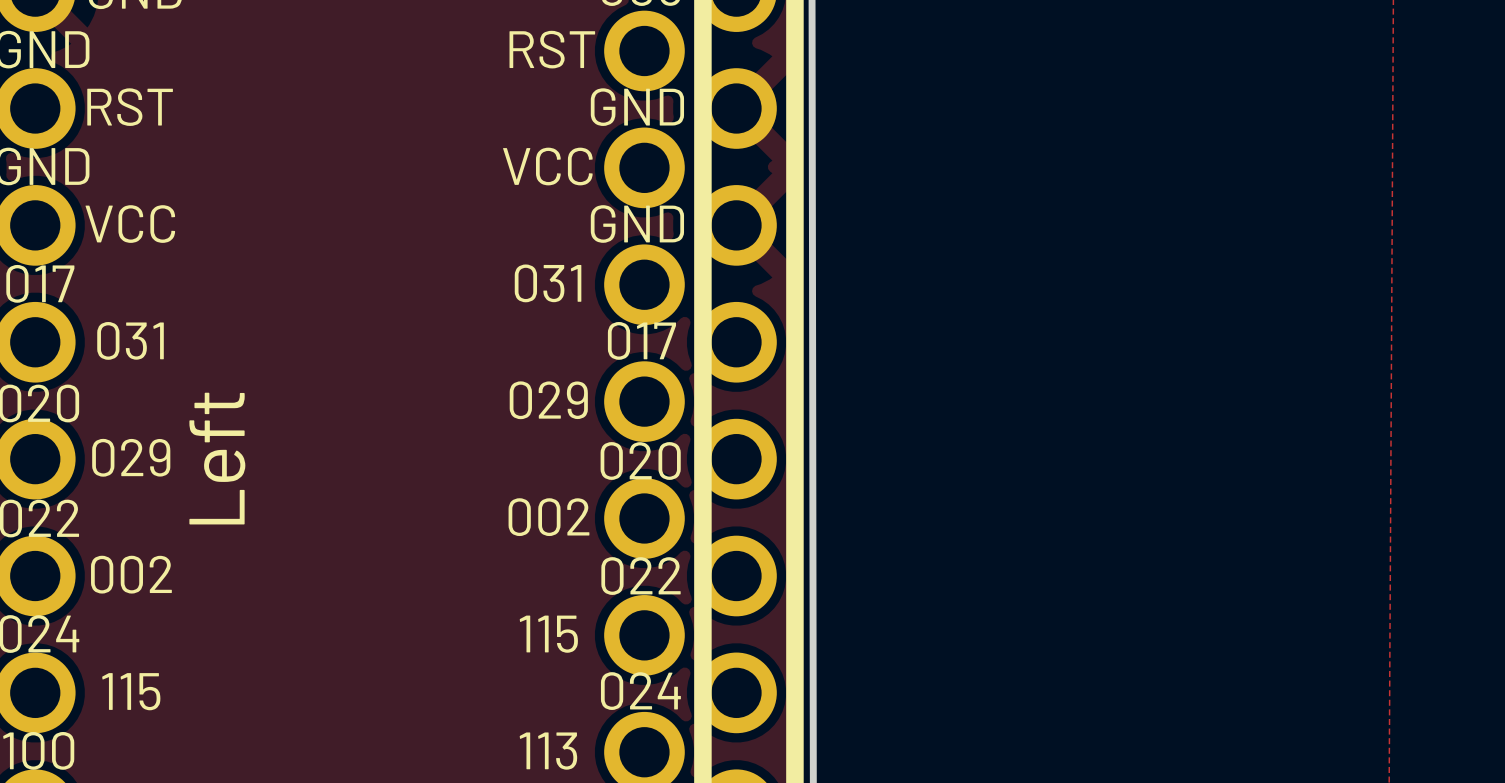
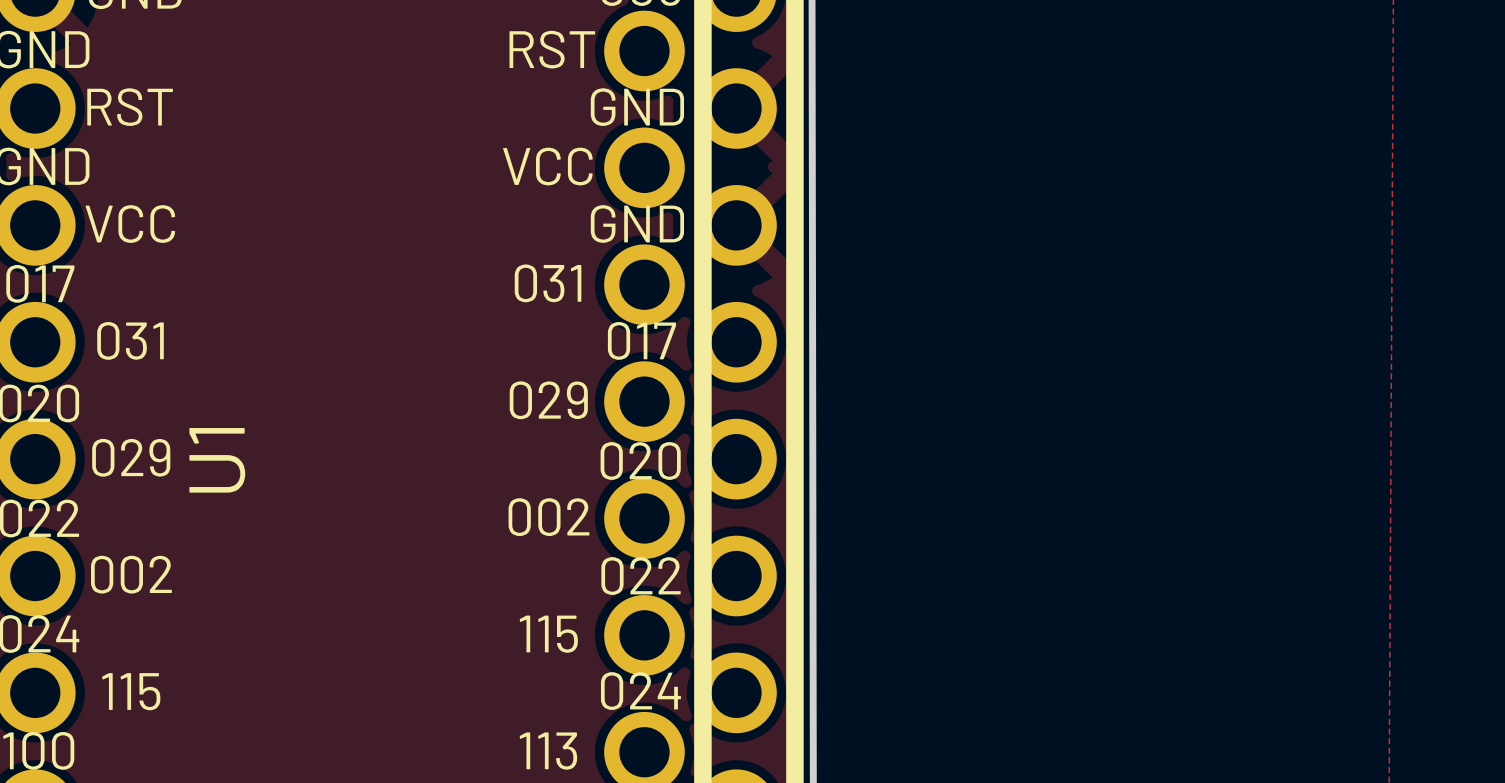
Left name: Left (217, 458) -> U1 (217, 460)

